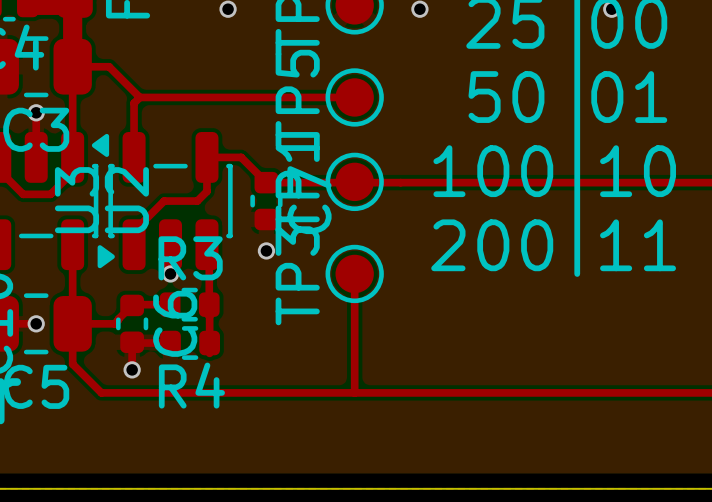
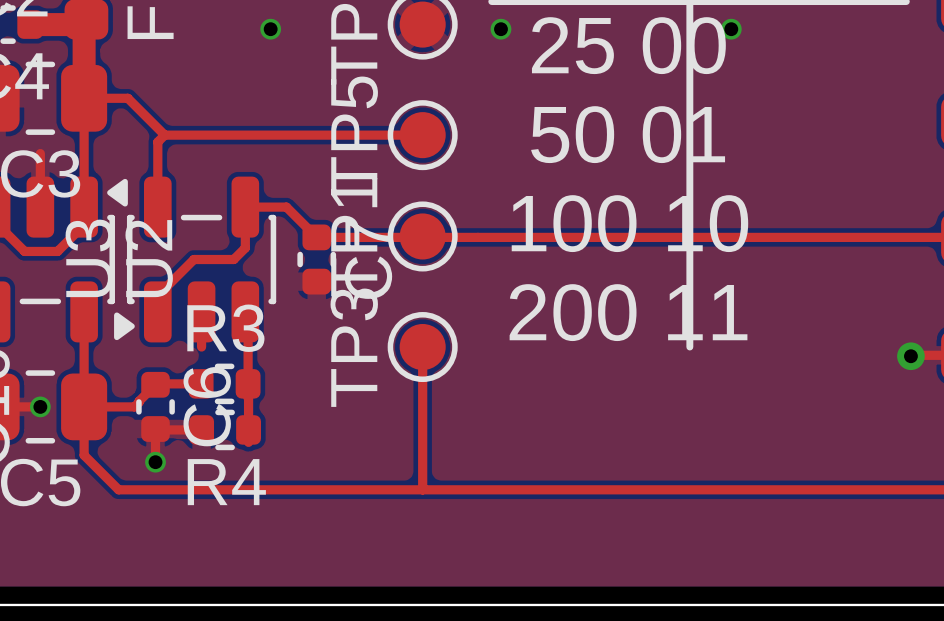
via: (36, 112) -> none
via: (266, 250) -> none
via: (170, 273) -> none

